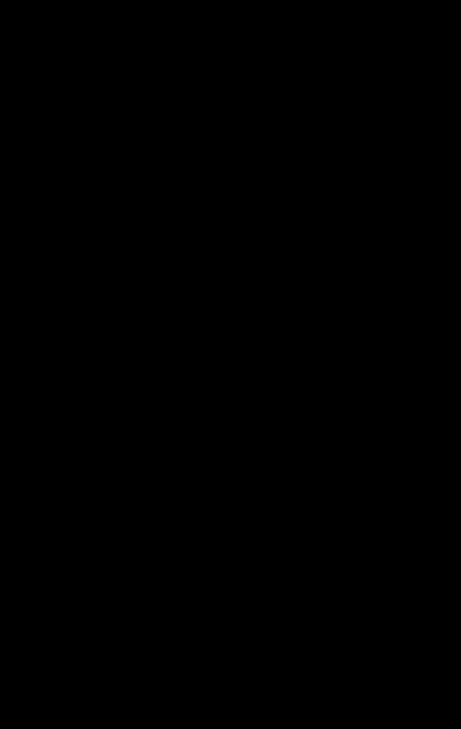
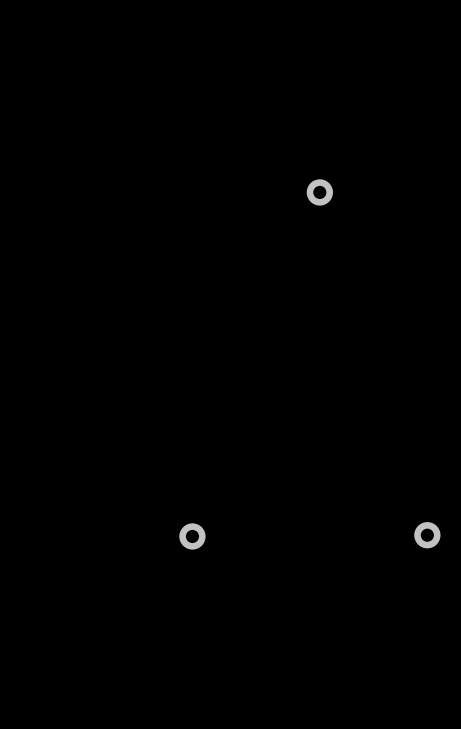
via: none -> (319, 192)
via: none -> (427, 535)
via: none -> (192, 536)

